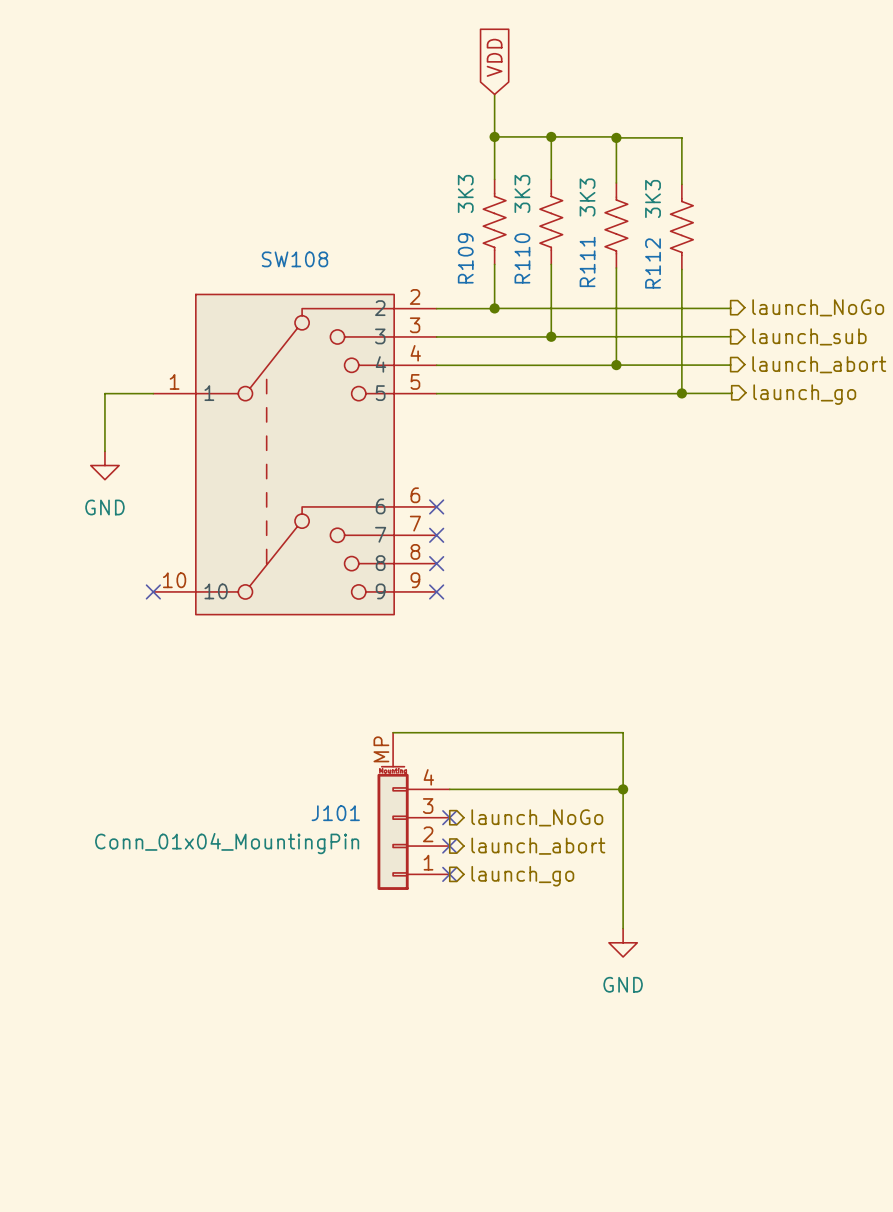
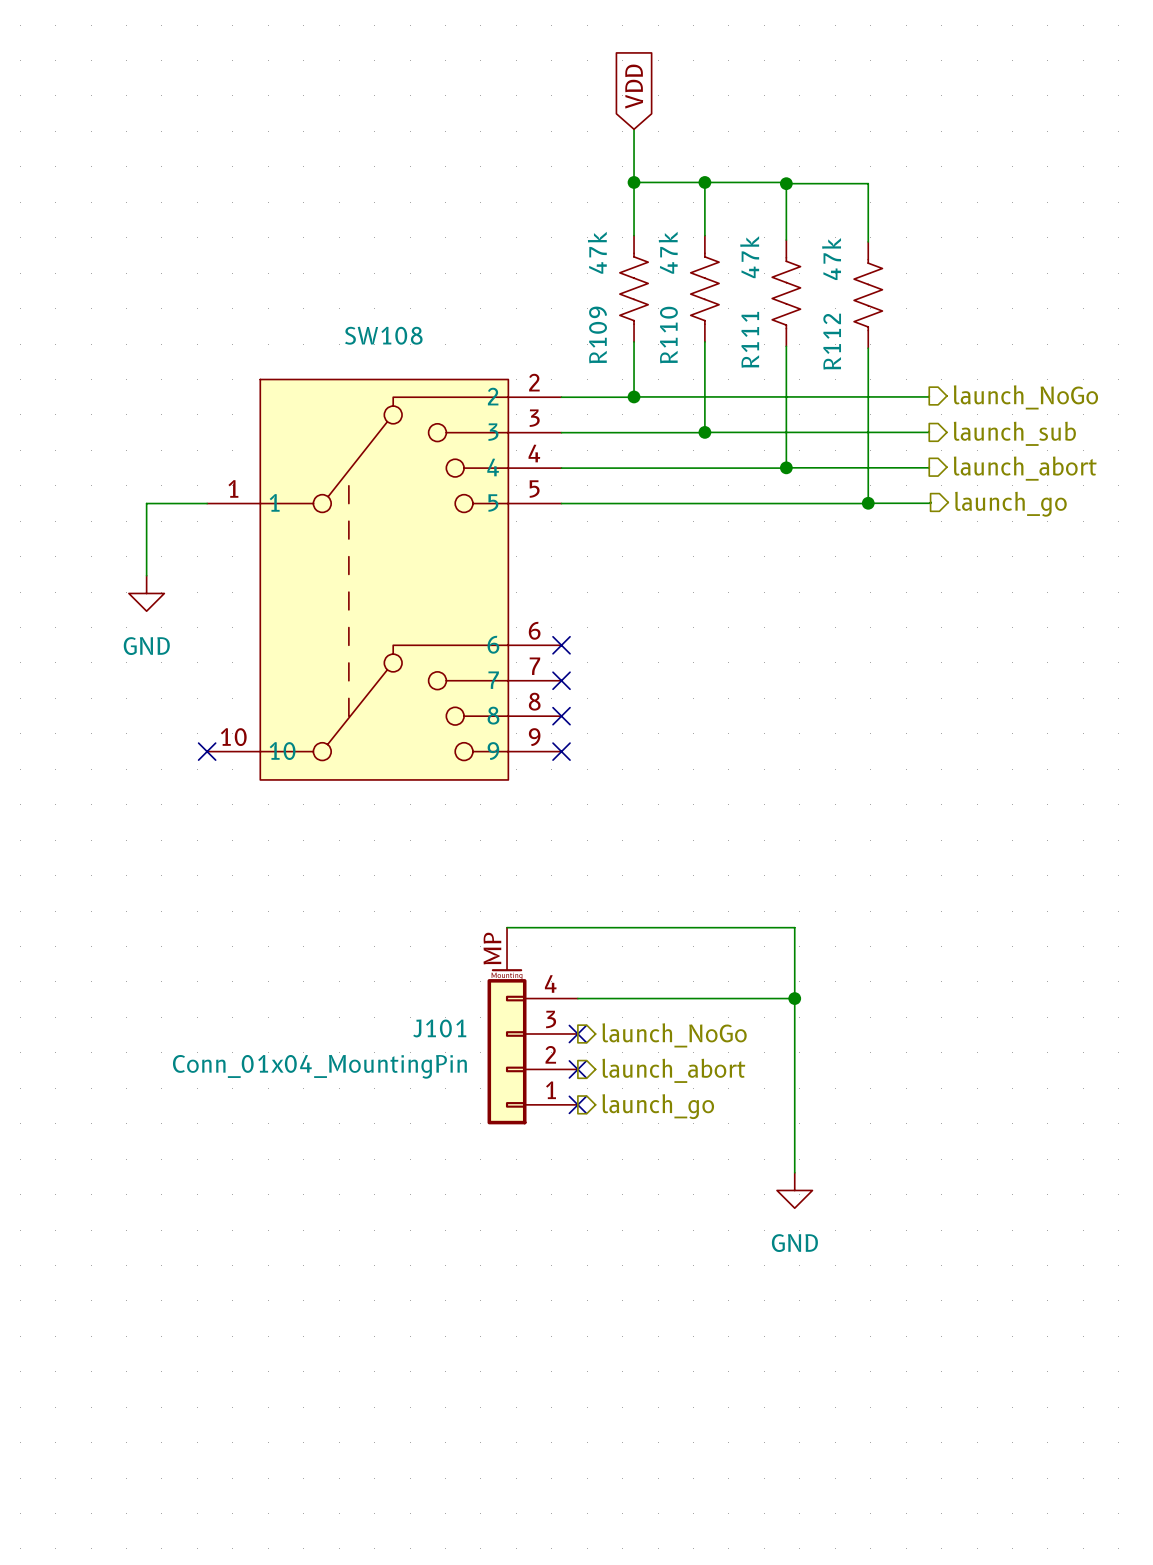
R109 value: 3K3 (465, 193) -> 47k (597, 252)
R110 value: 3K3 (522, 193) -> 47k (668, 252)
R111 value: 3K3 (587, 197) -> 47k (749, 257)
R112 value: 3K3 (653, 198) -> 47k (831, 259)

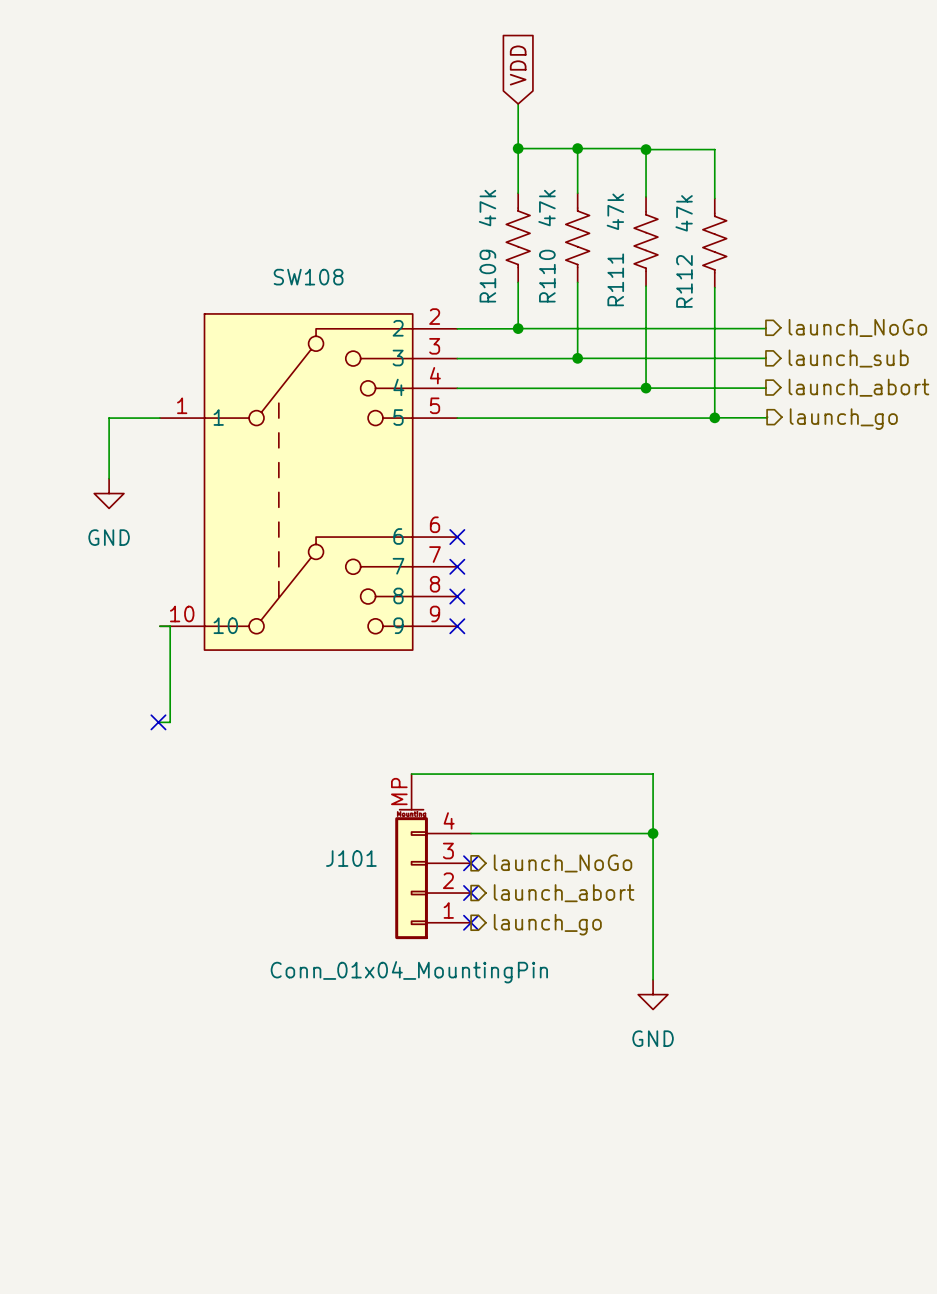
wire: none -> (159, 626) (170, 626) (170, 722) (158, 722)
no-connect mark: (207, 751) -> none
no-connect mark: none -> (158, 722)
J101 value position: Conn_01x04_MountingPin (319, 1066) -> Conn_01x04_MountingPin (409, 972)

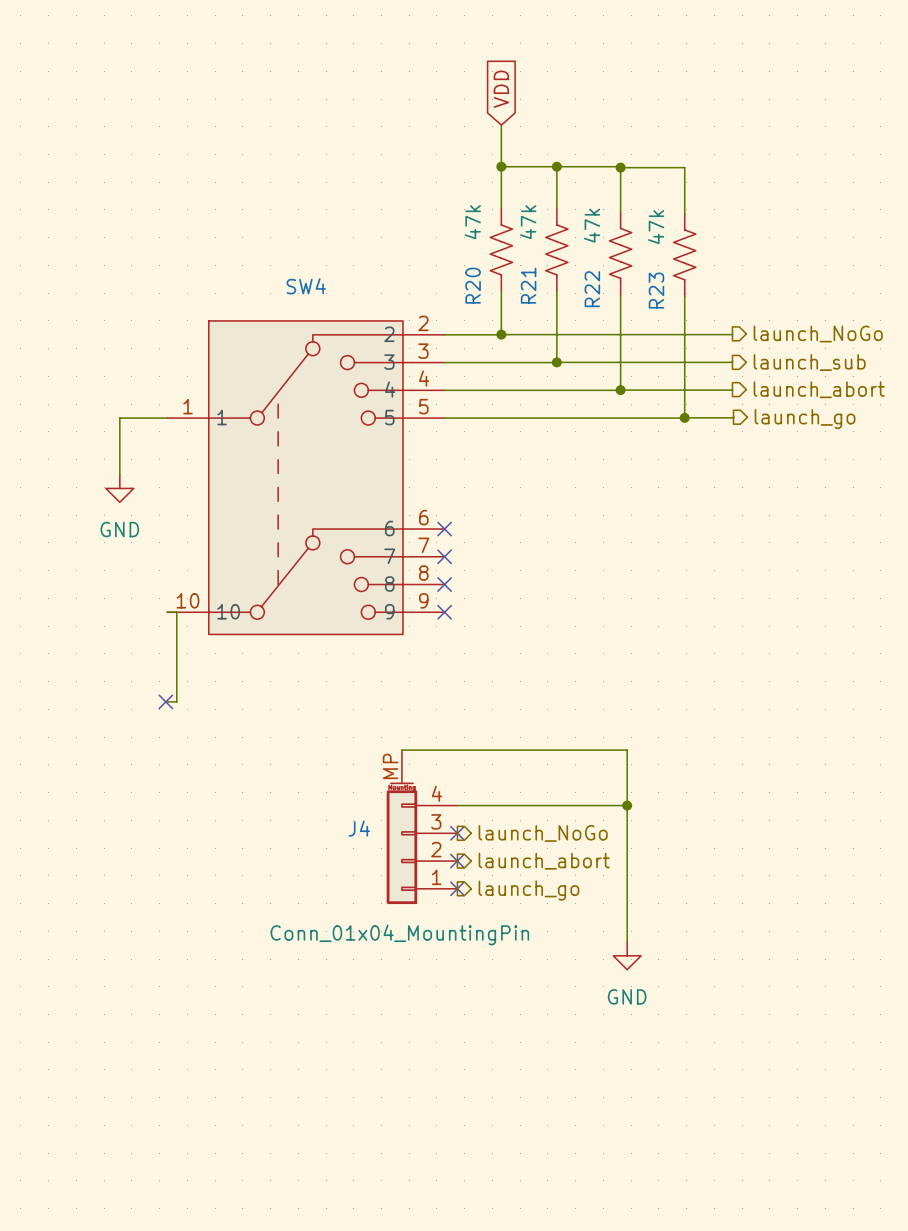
R109 name: R109 (487, 276) -> R20 (473, 285)
R110 name: R110 (547, 276) -> R21 (528, 285)
SW108 name: SW108 (308, 277) -> SW4 (306, 286)
R111 name: R111 (615, 279) -> R22 (592, 289)
R112 name: R112 (684, 281) -> R23 (656, 290)
J101 name: J101 (351, 858) -> J4 (359, 828)

